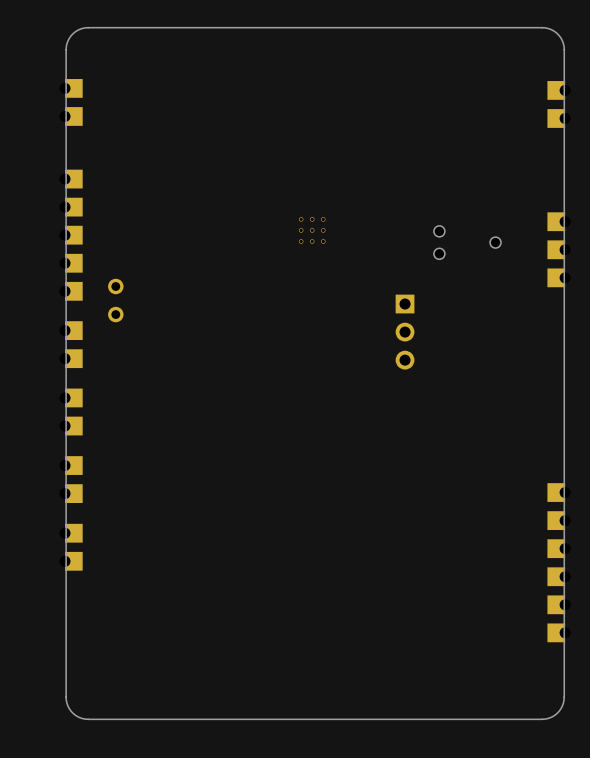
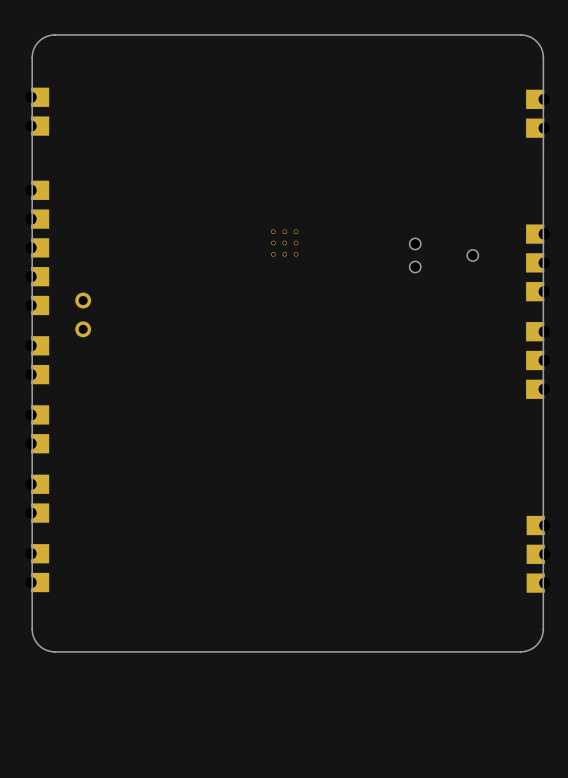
board edge: (564, 49) (564, 697) -> (543, 57) (543, 629) (542, 636) (536, 645) (530, 649) (520, 651)
part: (405, 332) -> none
part: none -> (538, 360)
part: none -> (538, 554)
part: (559, 562) -> none
board edge: (66, 606) (66, 697) -> (32, 629) (33, 636) (38, 645) (45, 649) (54, 651)
board edge: none -> (520, 651) (54, 651)
board edge: (564, 697) (562, 706) (557, 712) (549, 718) (542, 719) (88, 719) (78, 717) (72, 712) (68, 706) (66, 697) -> none

